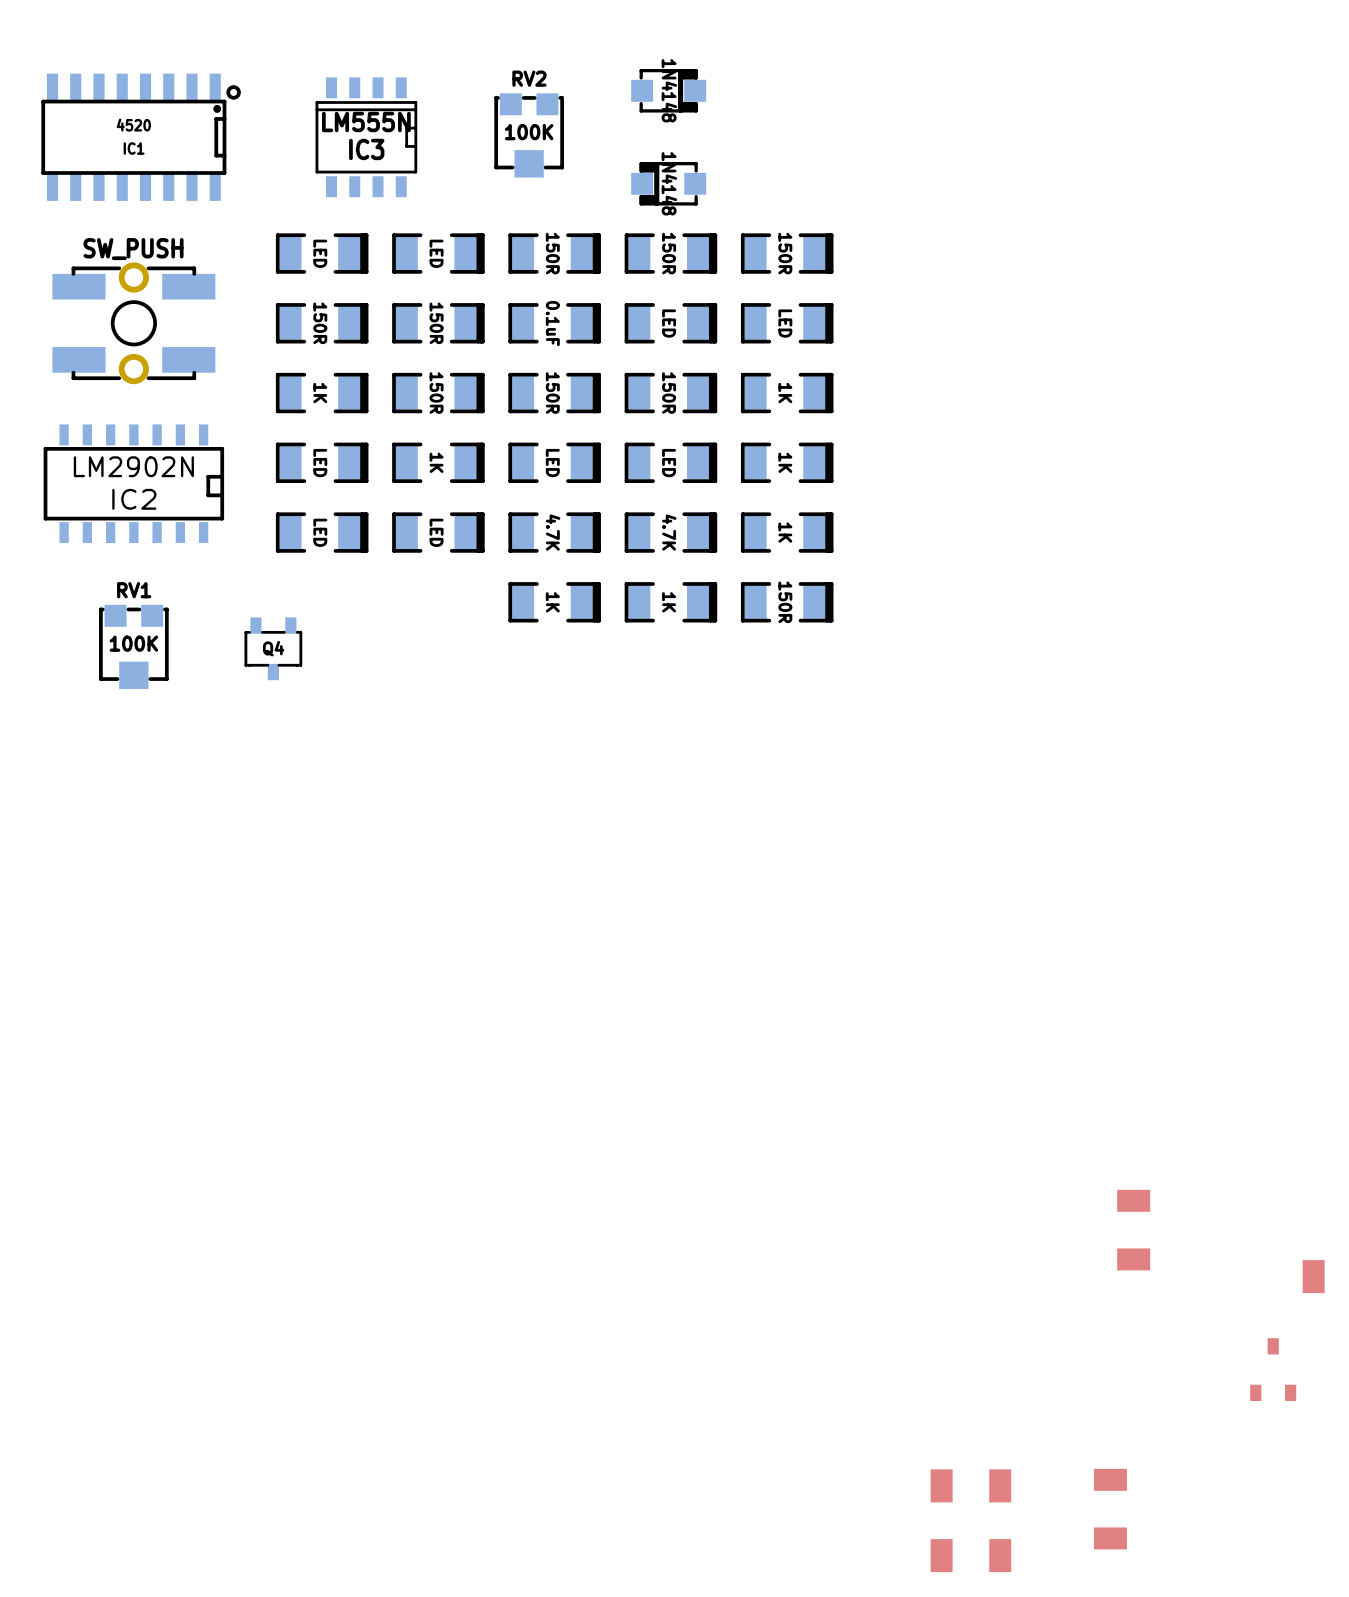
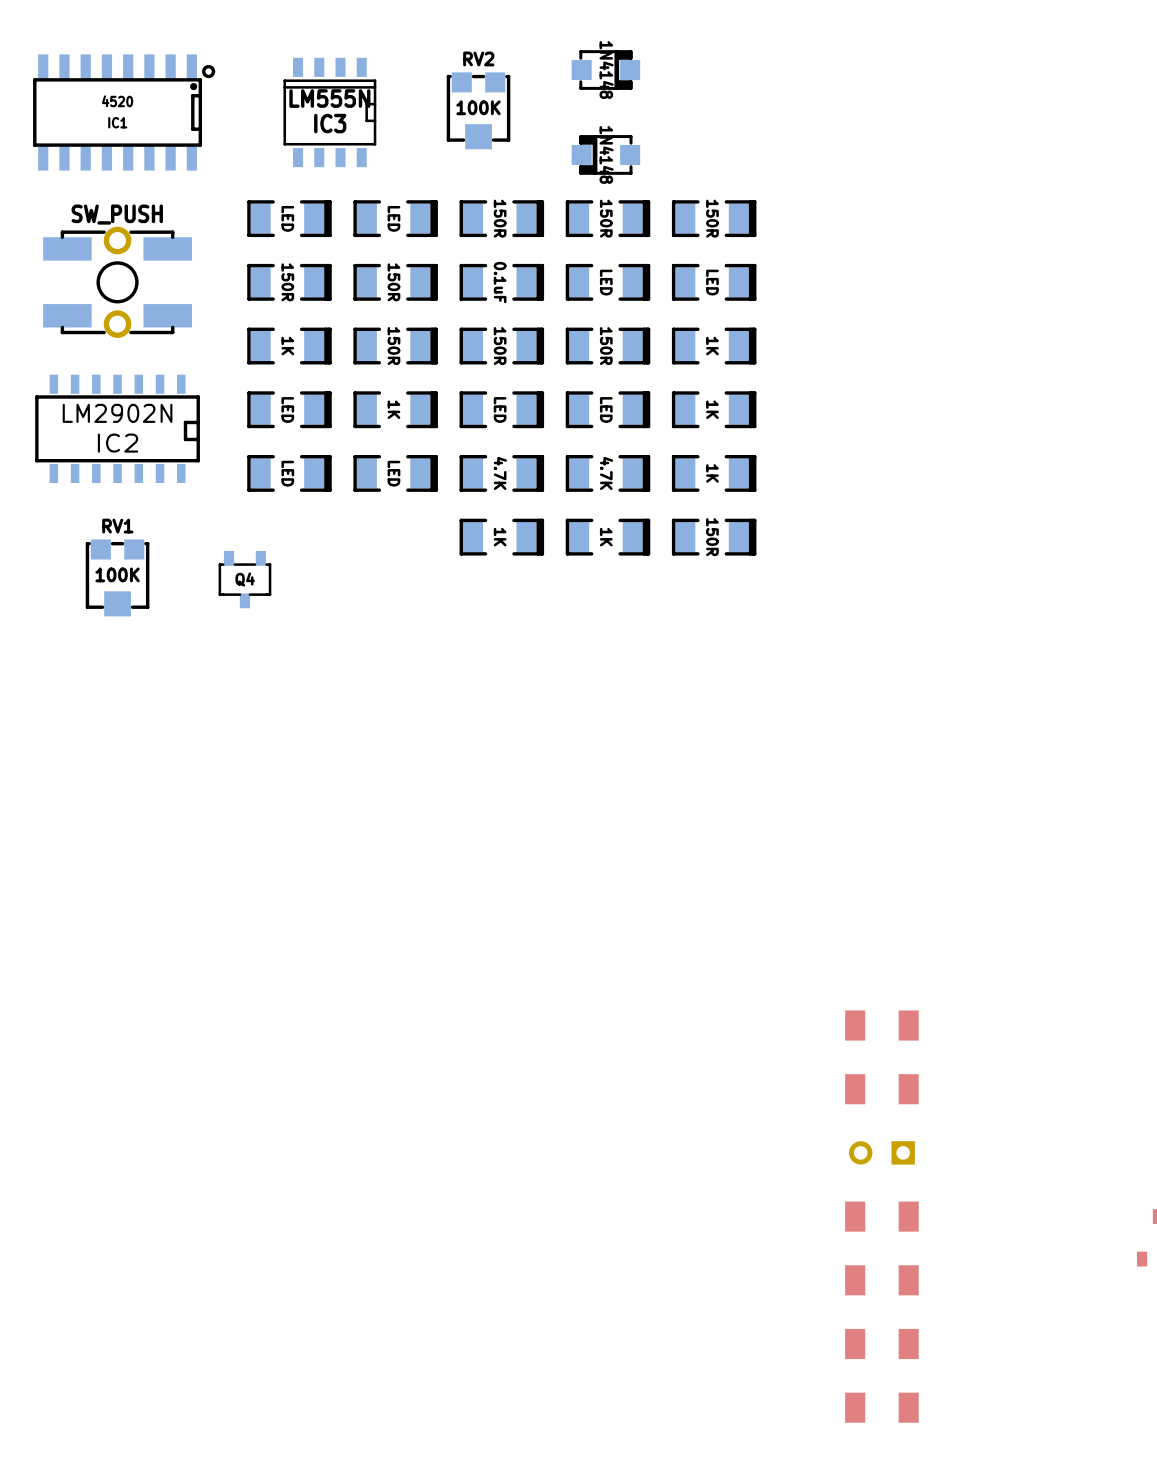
part: none -> (881, 1025)
part: none -> (881, 1089)
part: (1133, 1230) -> none
part: none -> (881, 1152)
part: none -> (881, 1216)
part: none -> (881, 1280)
part: (1110, 1509) -> none

